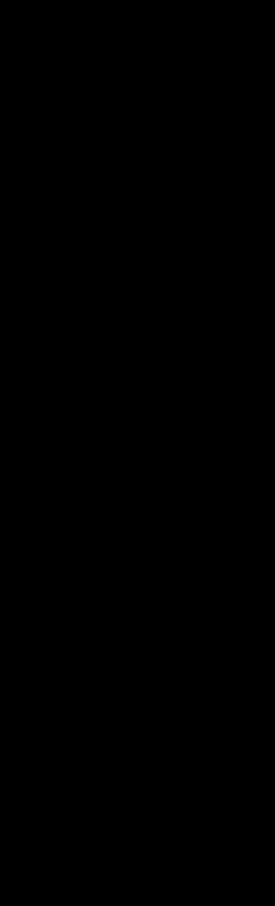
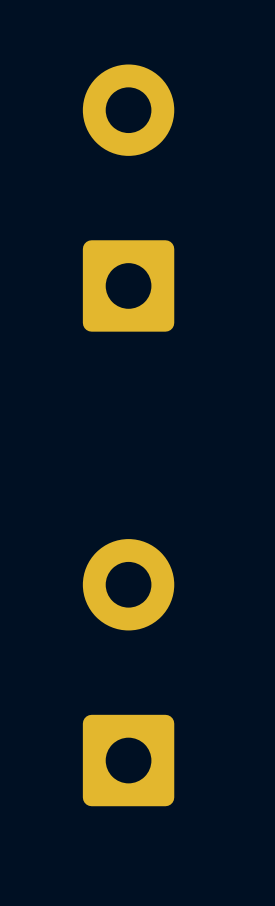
part: none -> (128, 198)
part: none -> (128, 672)

